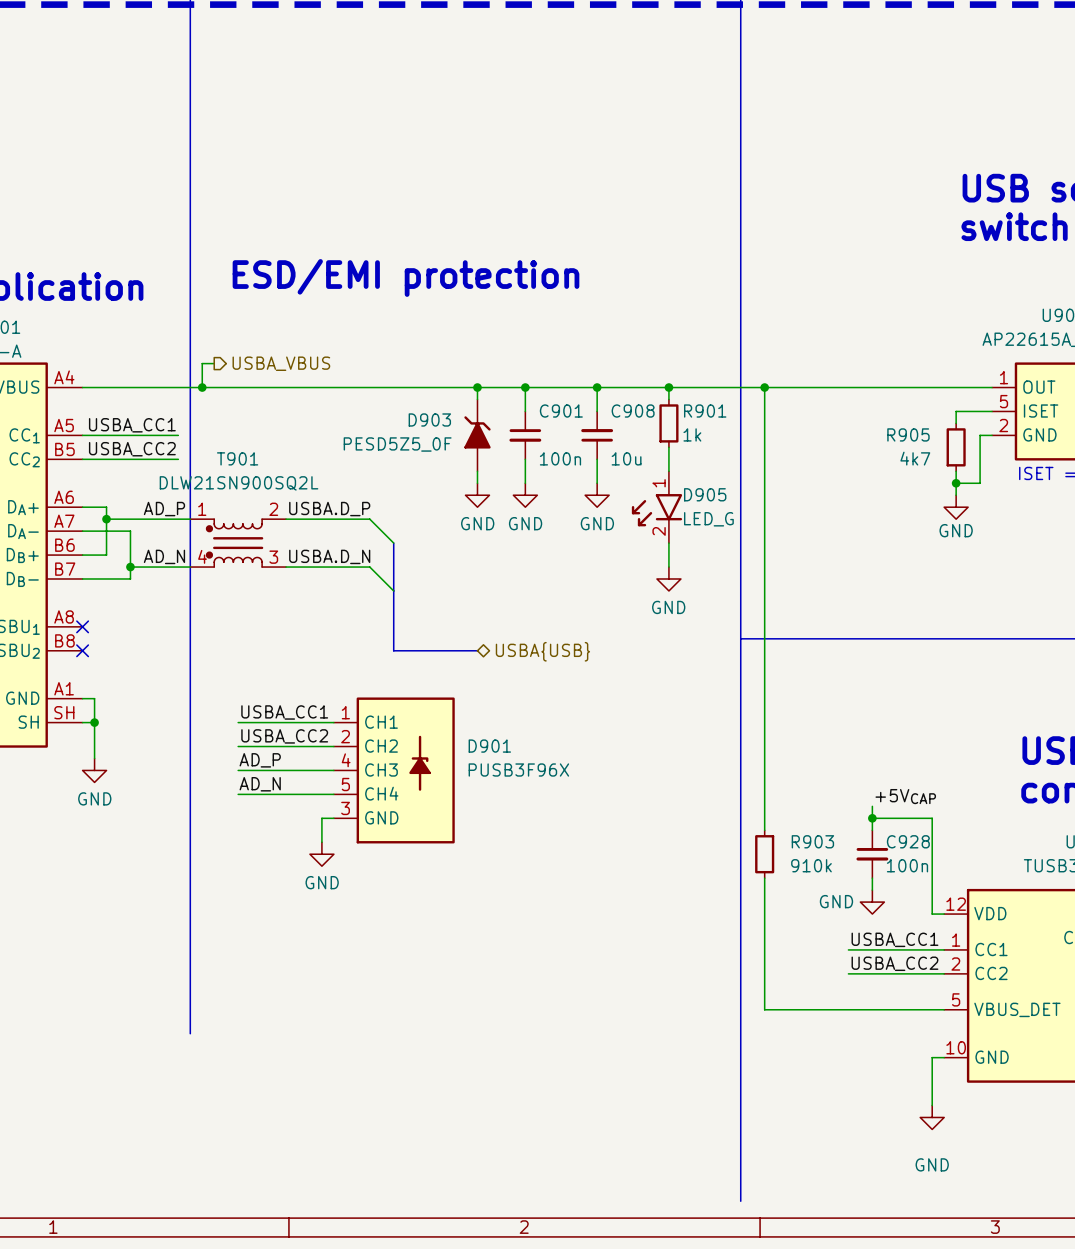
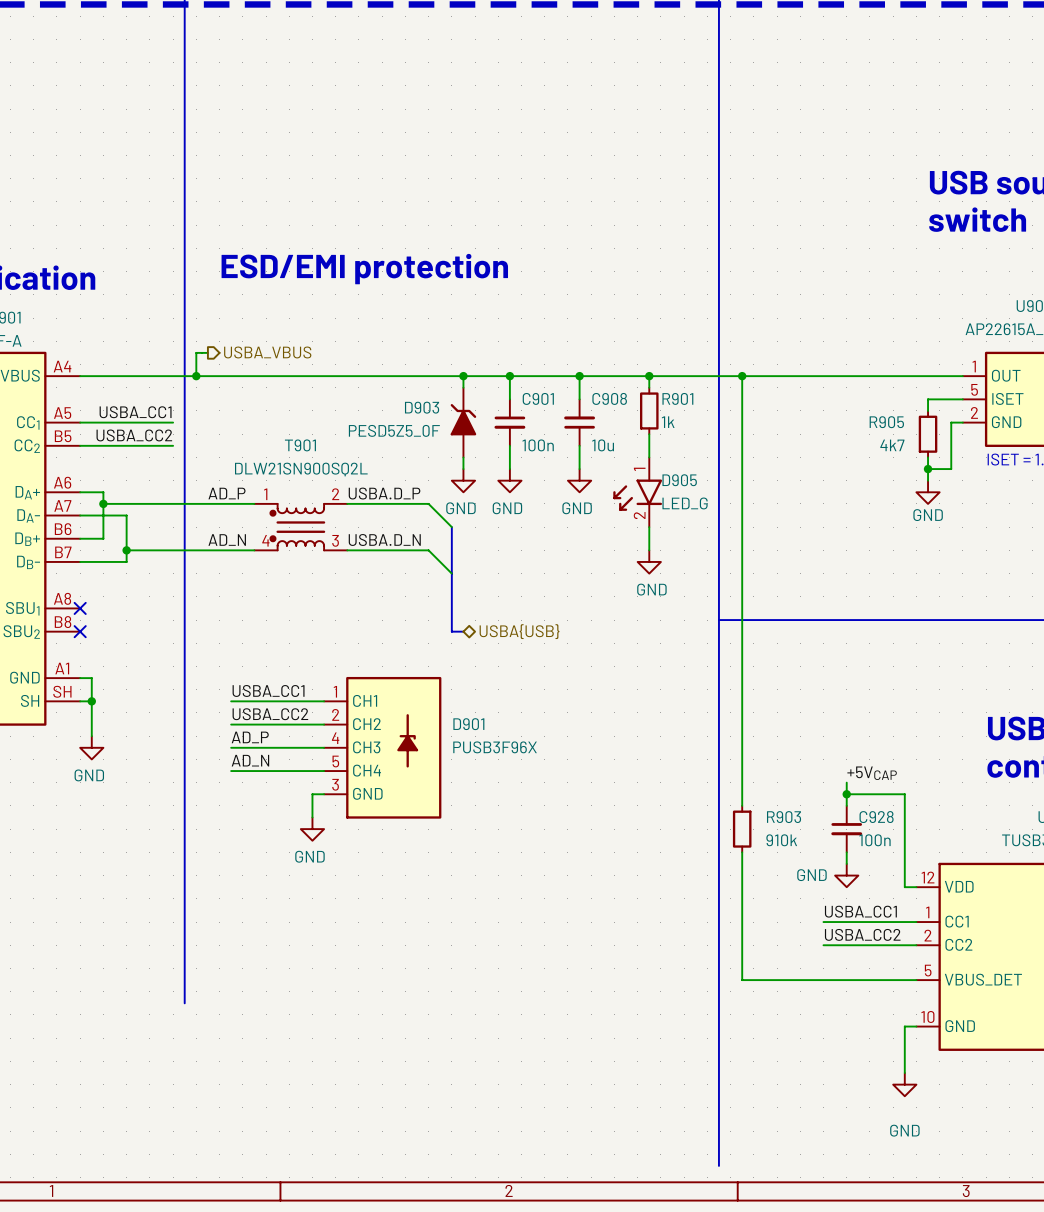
label position: AD_P (164, 509) -> AD_P (226, 493)
label position: USBA.D_P (329, 509) -> USBA.D_P (384, 493)
wire: (286, 519) (357, 519) -> (184, 503) (254, 503)
wire: (369, 519) (393, 543) -> (358, 503) (428, 503) (451, 527)
T901 position: (238, 543) -> (300, 527)
bus: (393, 543) (393, 650) (465, 650) -> (451, 527) (451, 631)
label position: AD_N (164, 556) -> AD_N (227, 539)
label position: USBA.D_N (329, 556) -> USBA.D_N (384, 539)
wire: (286, 567) (357, 567) -> (184, 550) (254, 550)
wire: (369, 567) (393, 590) -> (358, 550) (428, 550) (451, 573)

